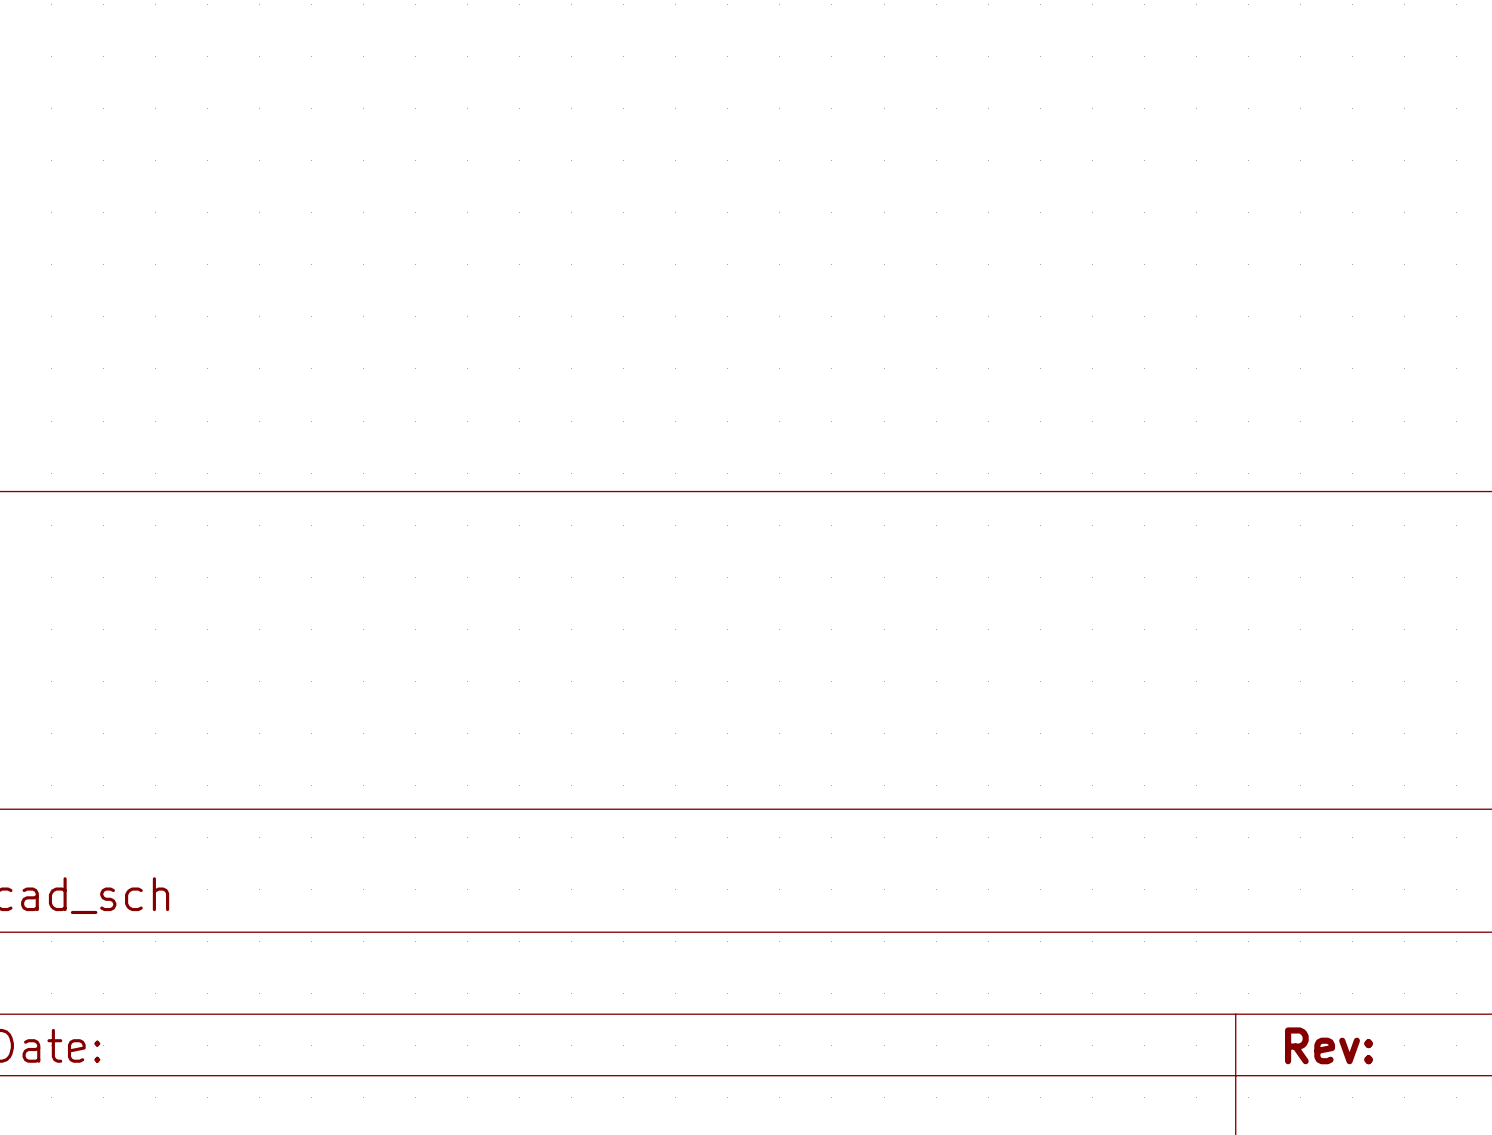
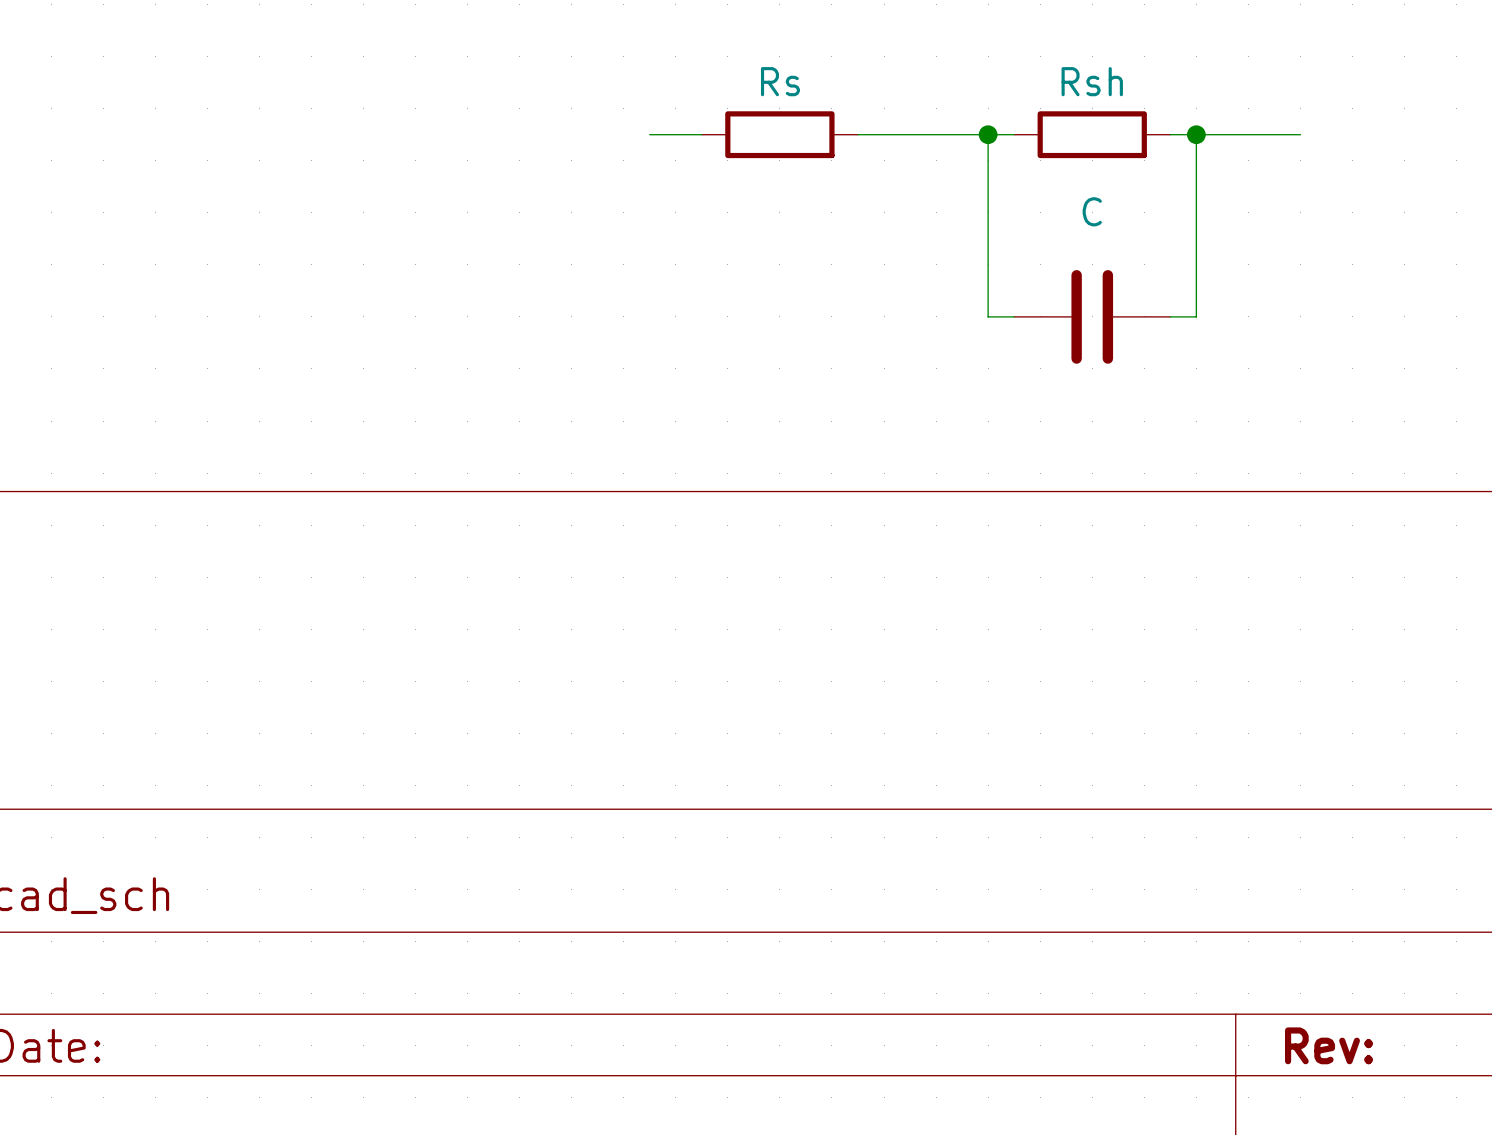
wire: none -> (649, 134) (701, 134)
part: none -> Rs (779, 134)
wire: none -> (857, 134) (1014, 134)
wire: none -> (988, 134) (988, 316) (1014, 316)
junction: none -> (988, 134)
part: none -> Rsh (1092, 134)
wire: none -> (1170, 134) (1300, 134)
wire: none -> (1196, 134) (1196, 316) (1170, 316)
junction: none -> (1196, 134)
part: none -> C (1092, 316)

